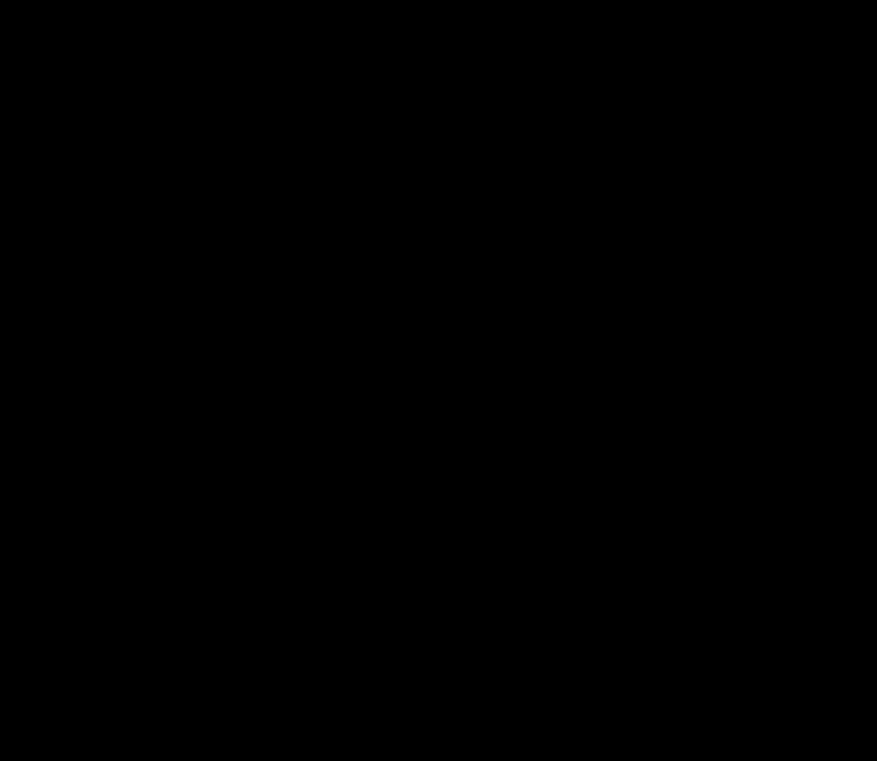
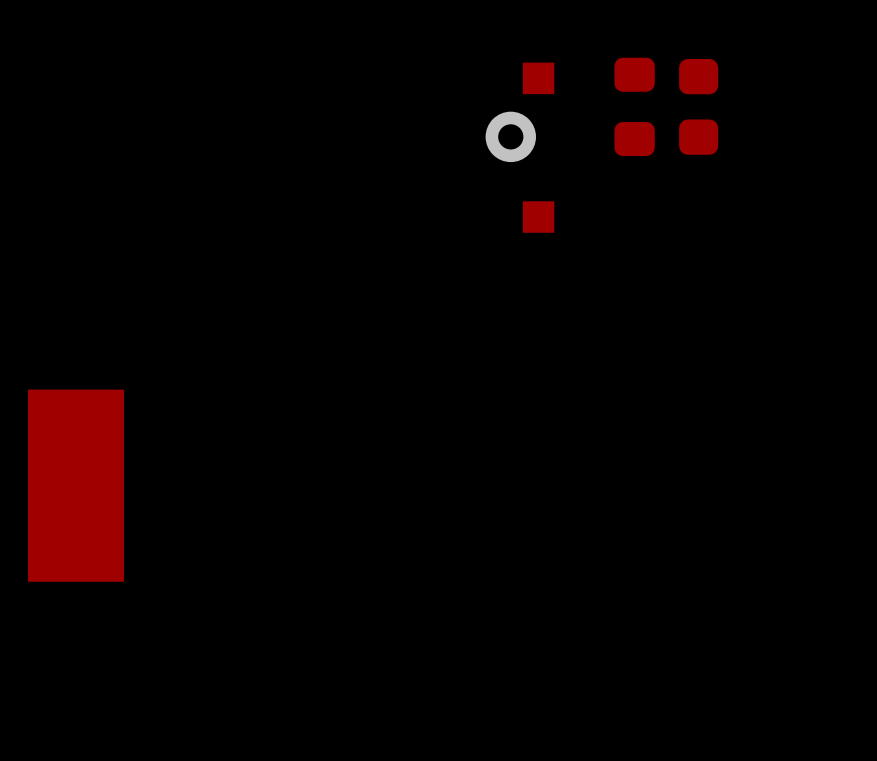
part: none -> (634, 106)
part: none -> (698, 106)
via: none -> (510, 136)
part: none -> (538, 147)
part: none -> (76, 485)

